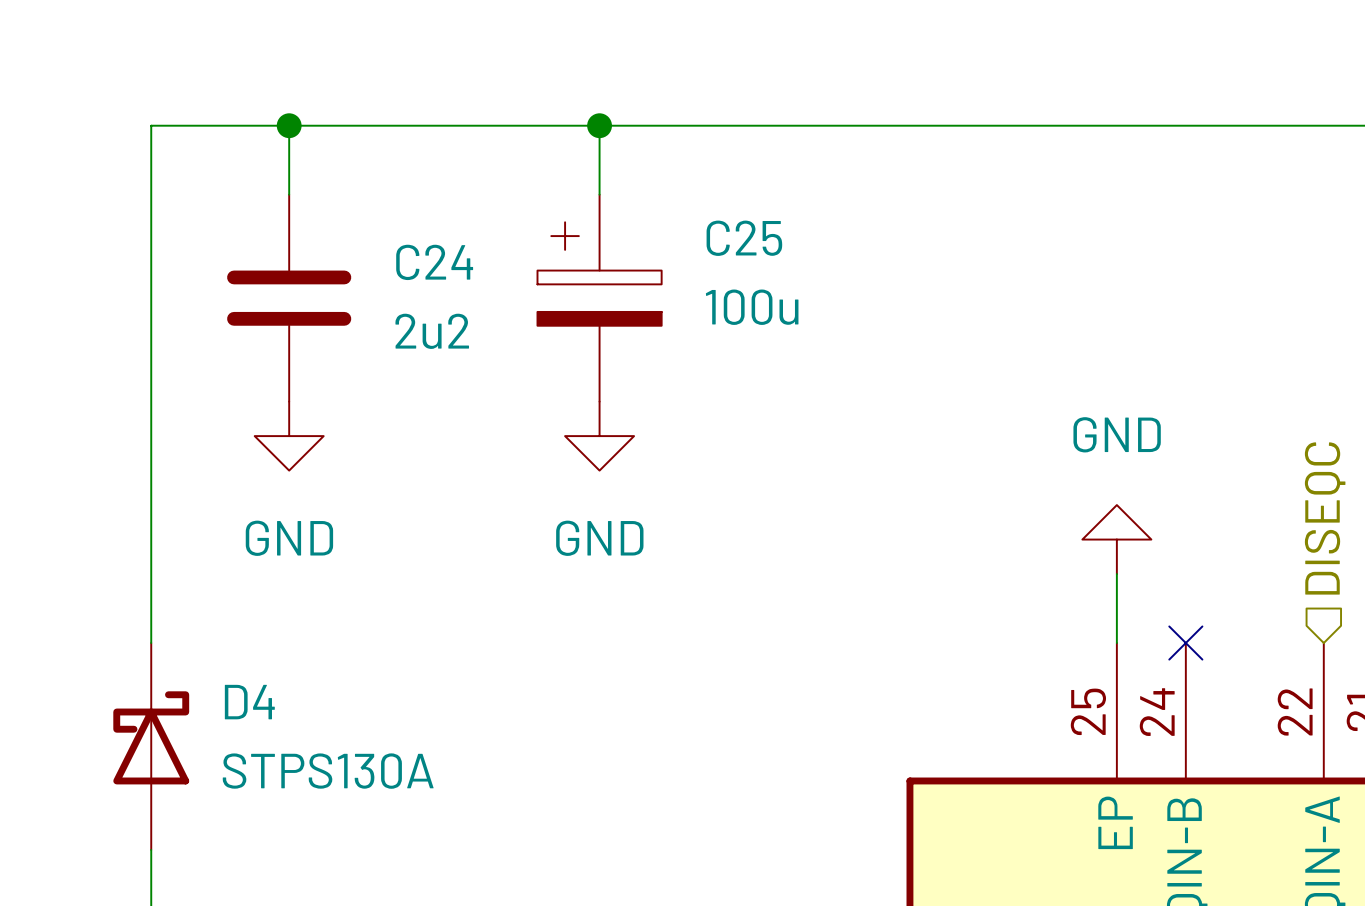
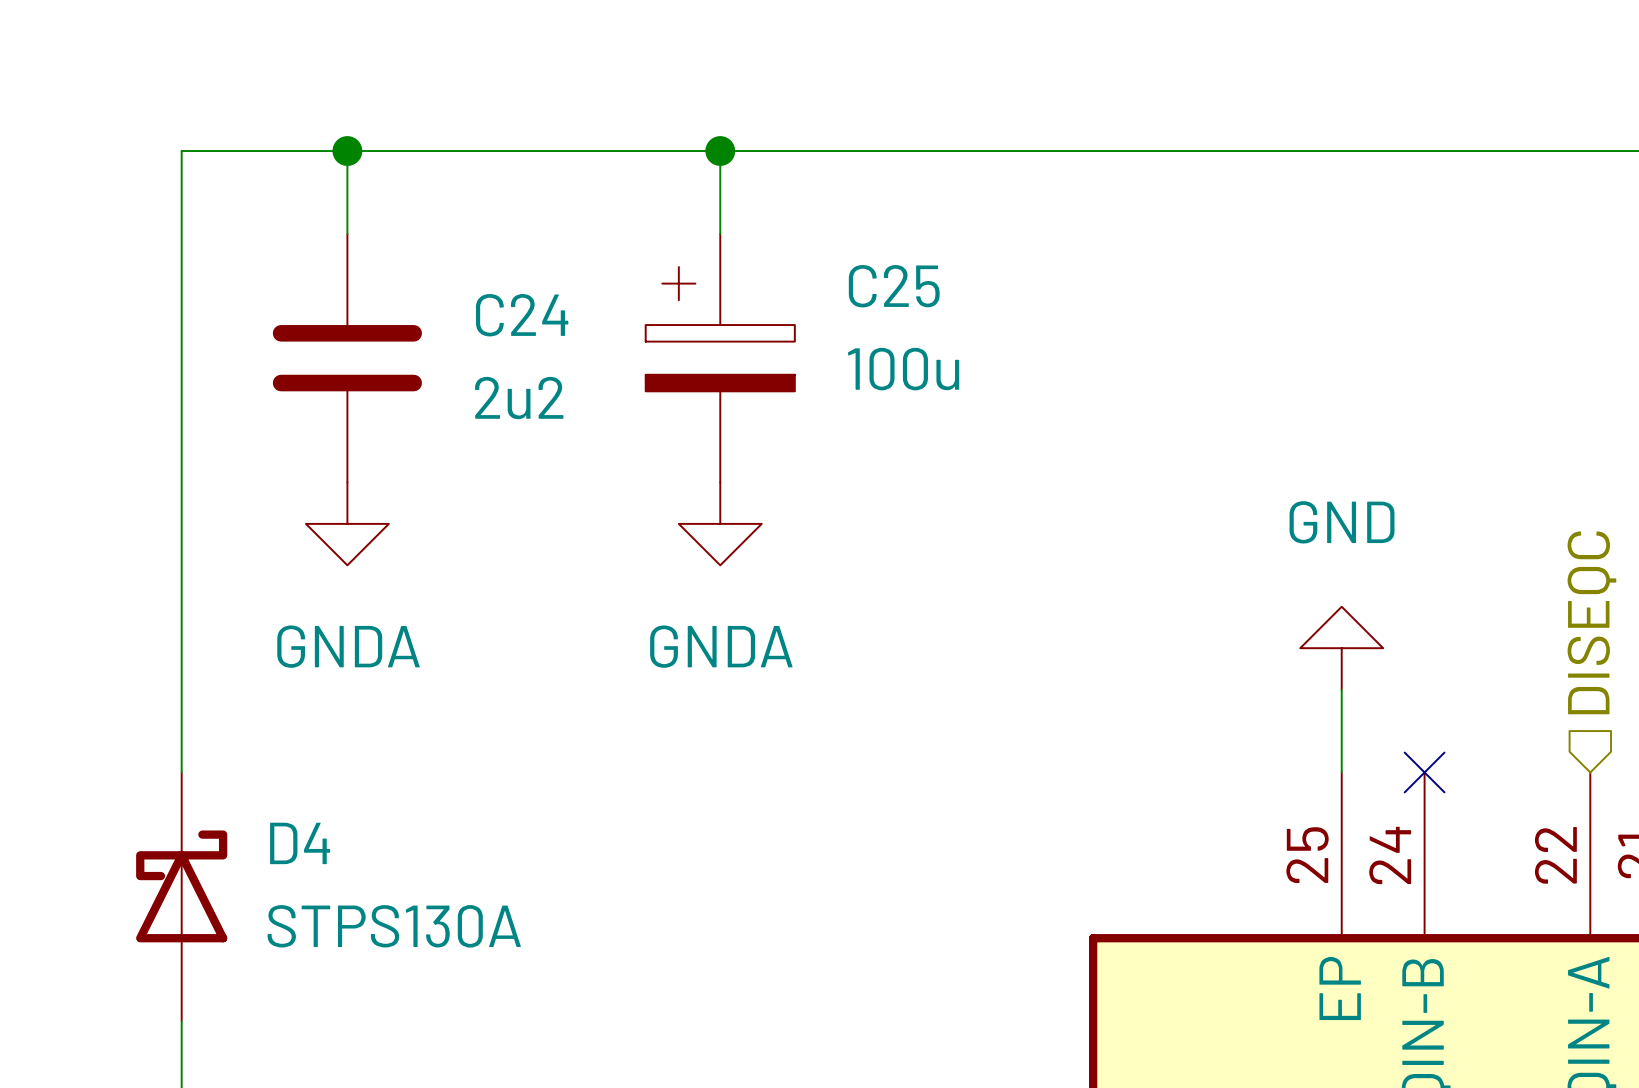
power symbol: GND (289, 436) -> GNDA (347, 523)
power symbol: GND (599, 436) -> GNDA (720, 523)

